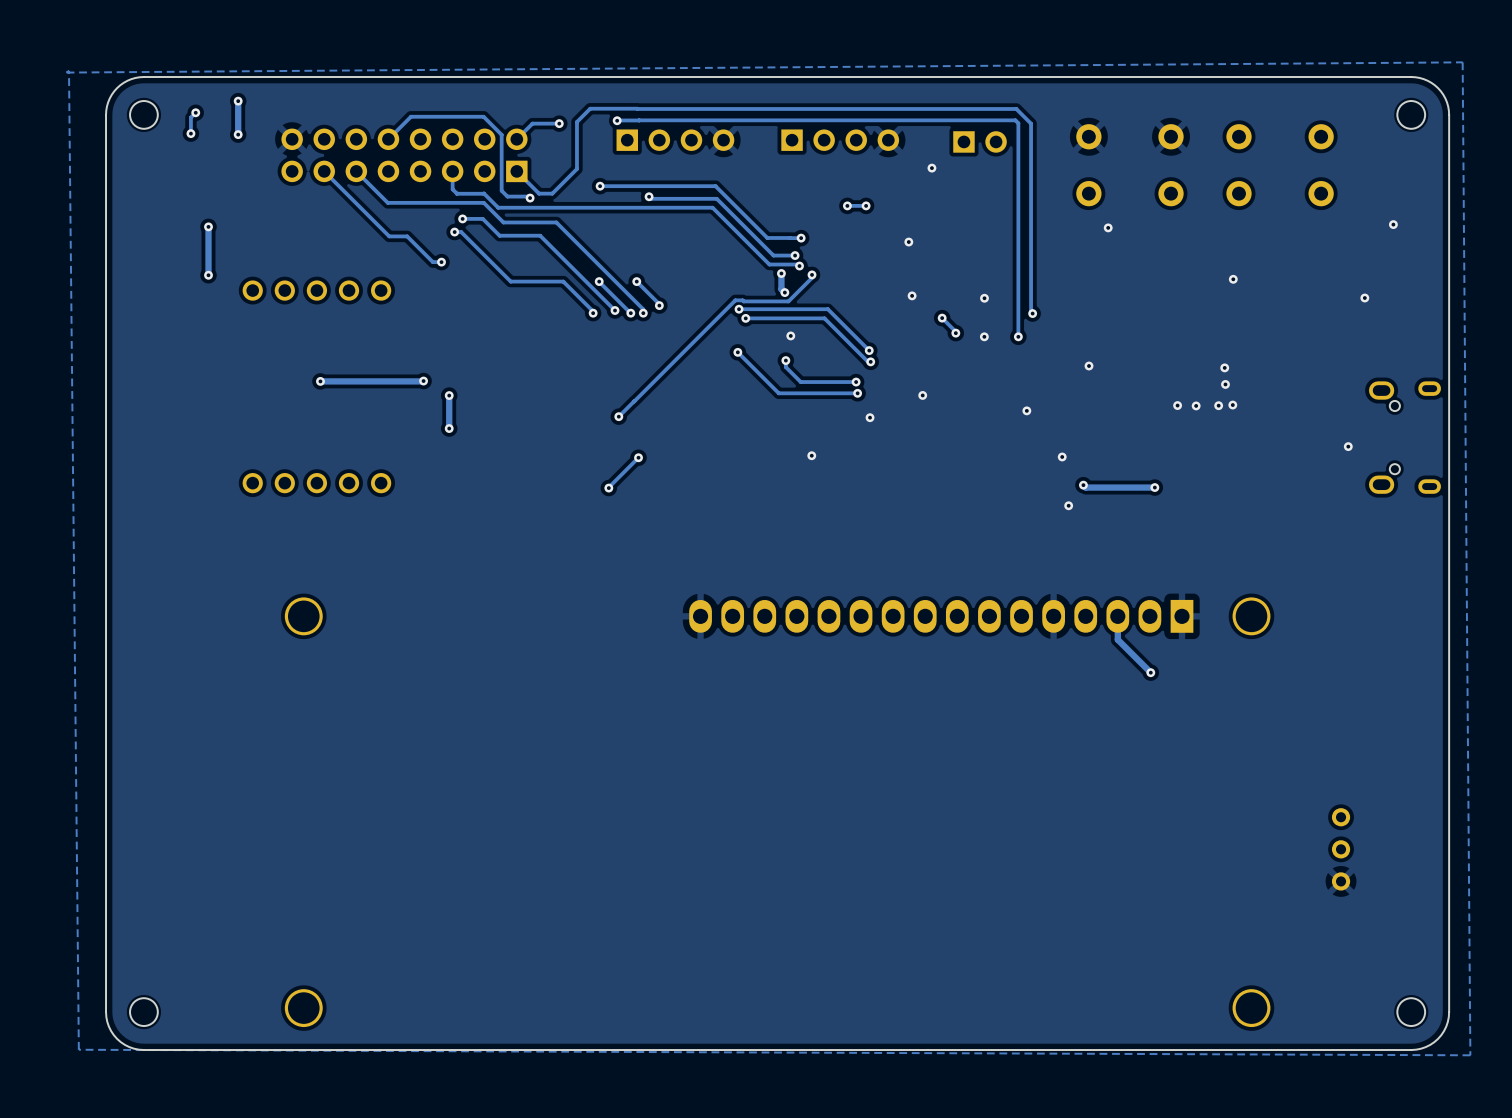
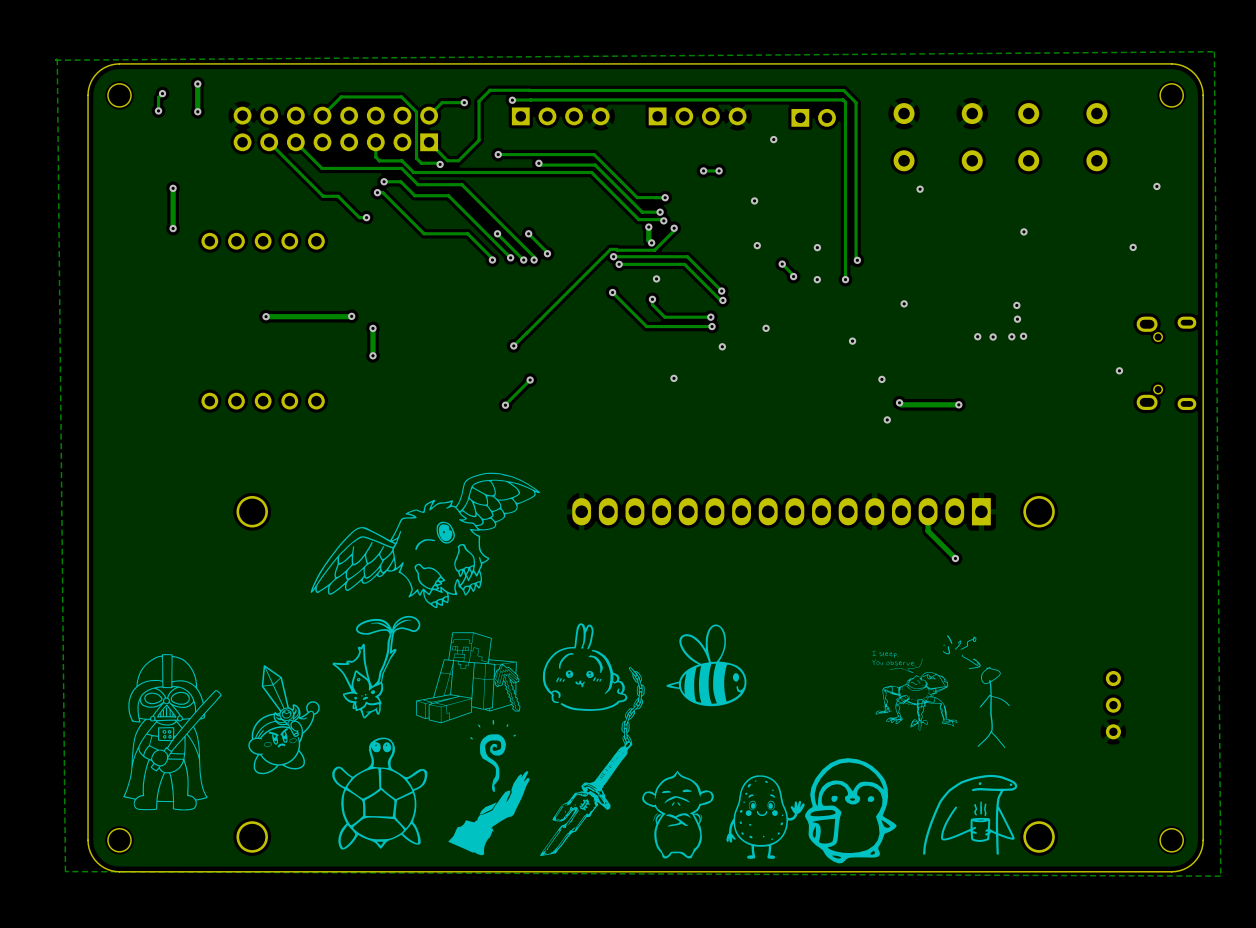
drawing: none -> [310, 472, 714, 859]
drawing: none -> [666, 624, 747, 707]
drawing: none -> [871, 635, 1010, 749]
drawing: none -> [123, 654, 222, 811]
drawing: none -> [248, 665, 428, 850]
drawing: none -> [726, 758, 897, 864]
drawing: none -> [923, 774, 1018, 855]

